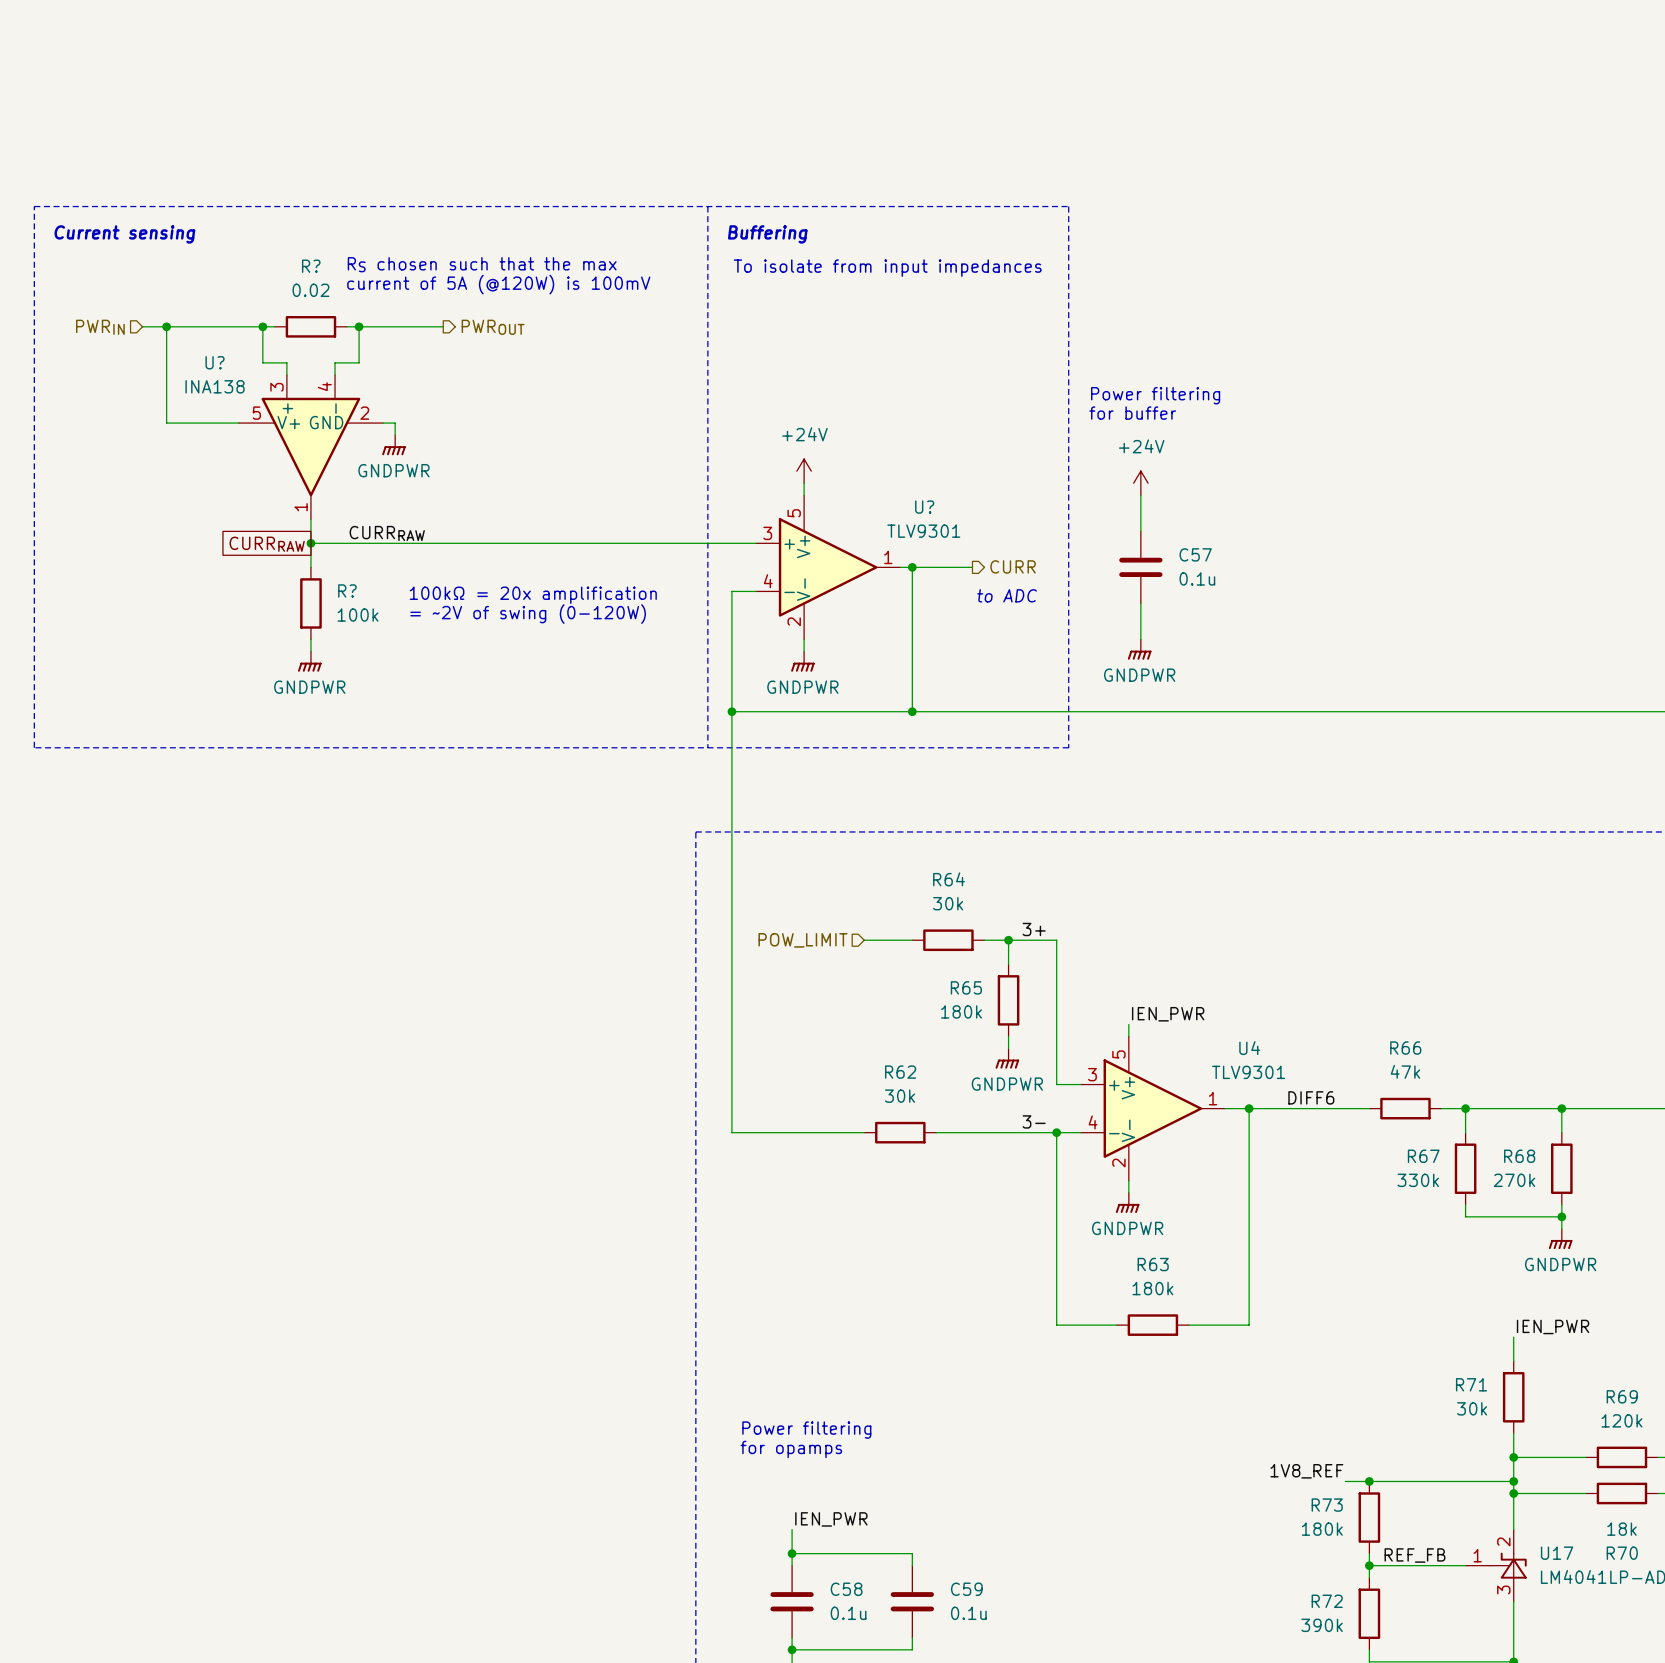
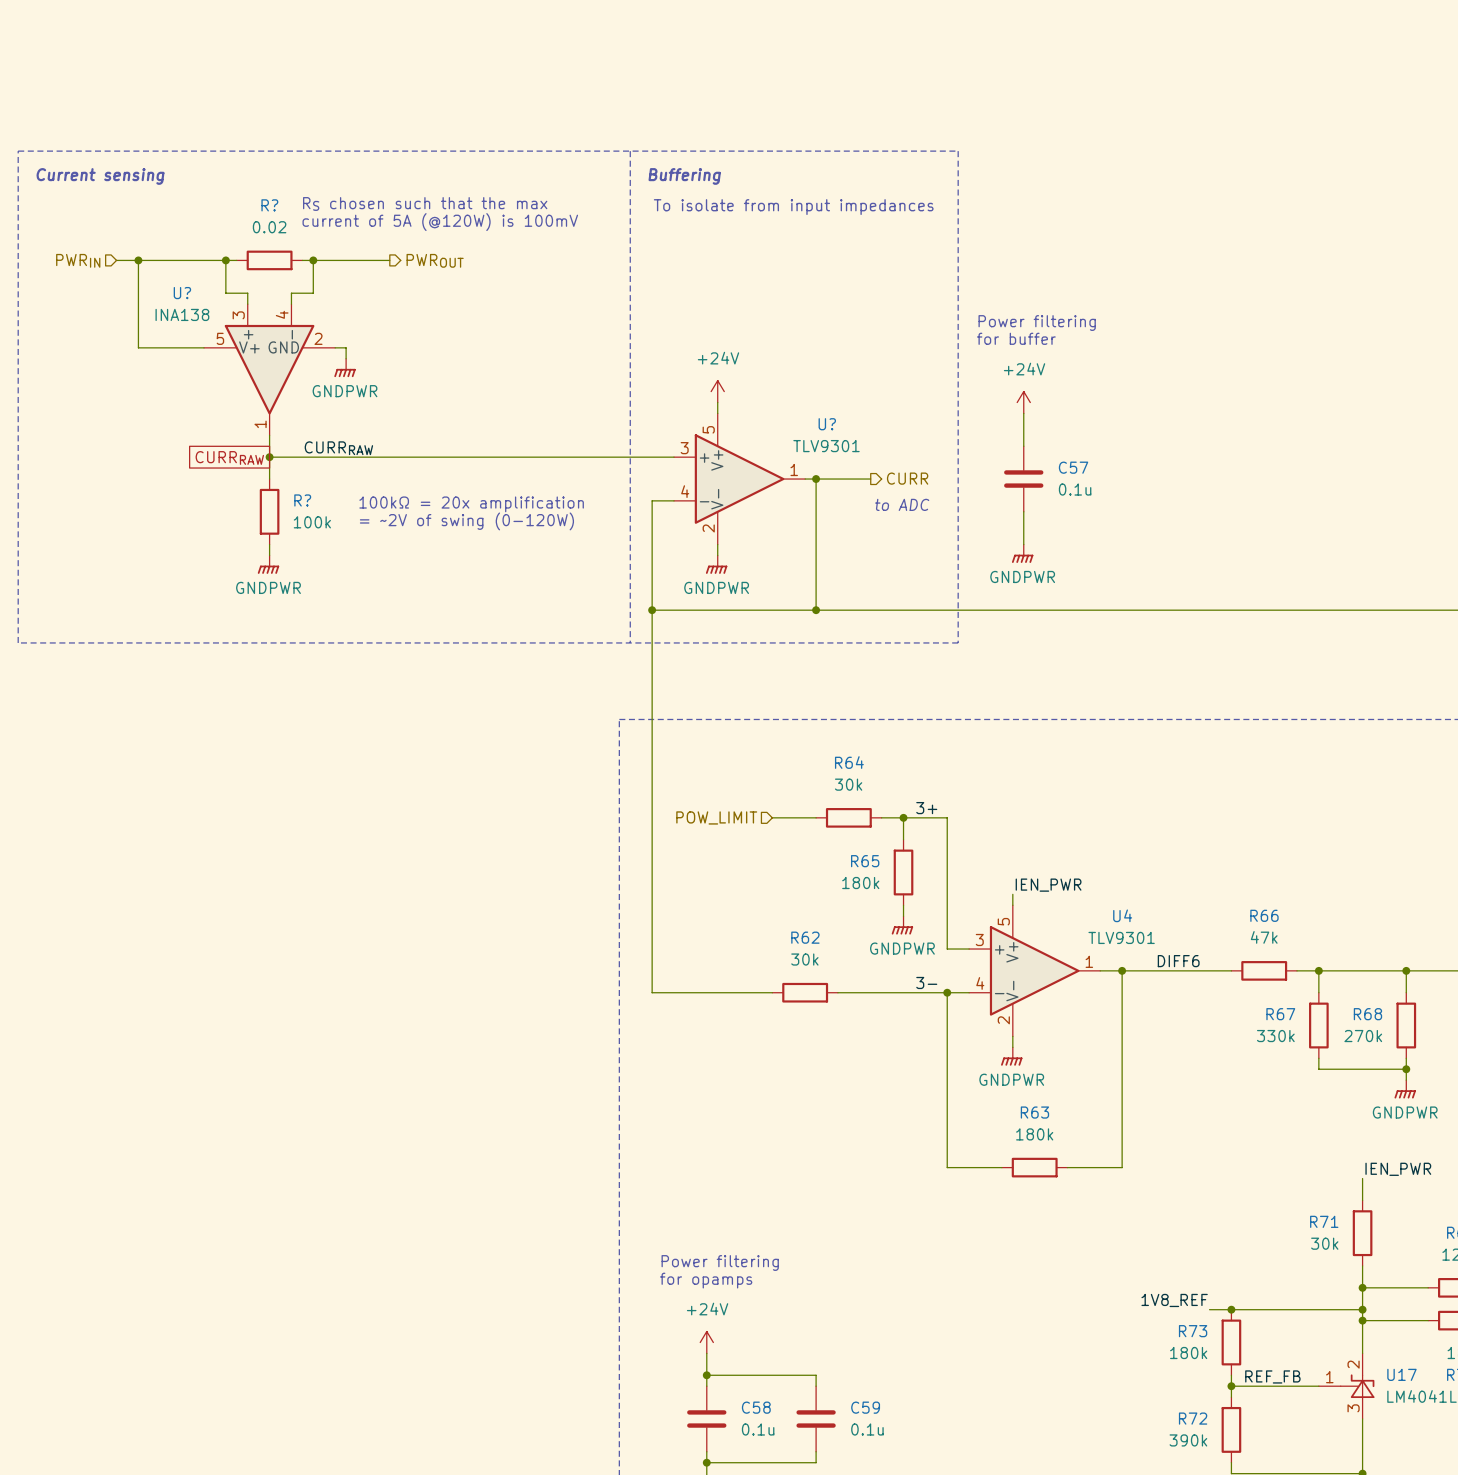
power symbol: none -> +24V (706, 1342)
label: IEN_PWR (831, 1519) -> none

